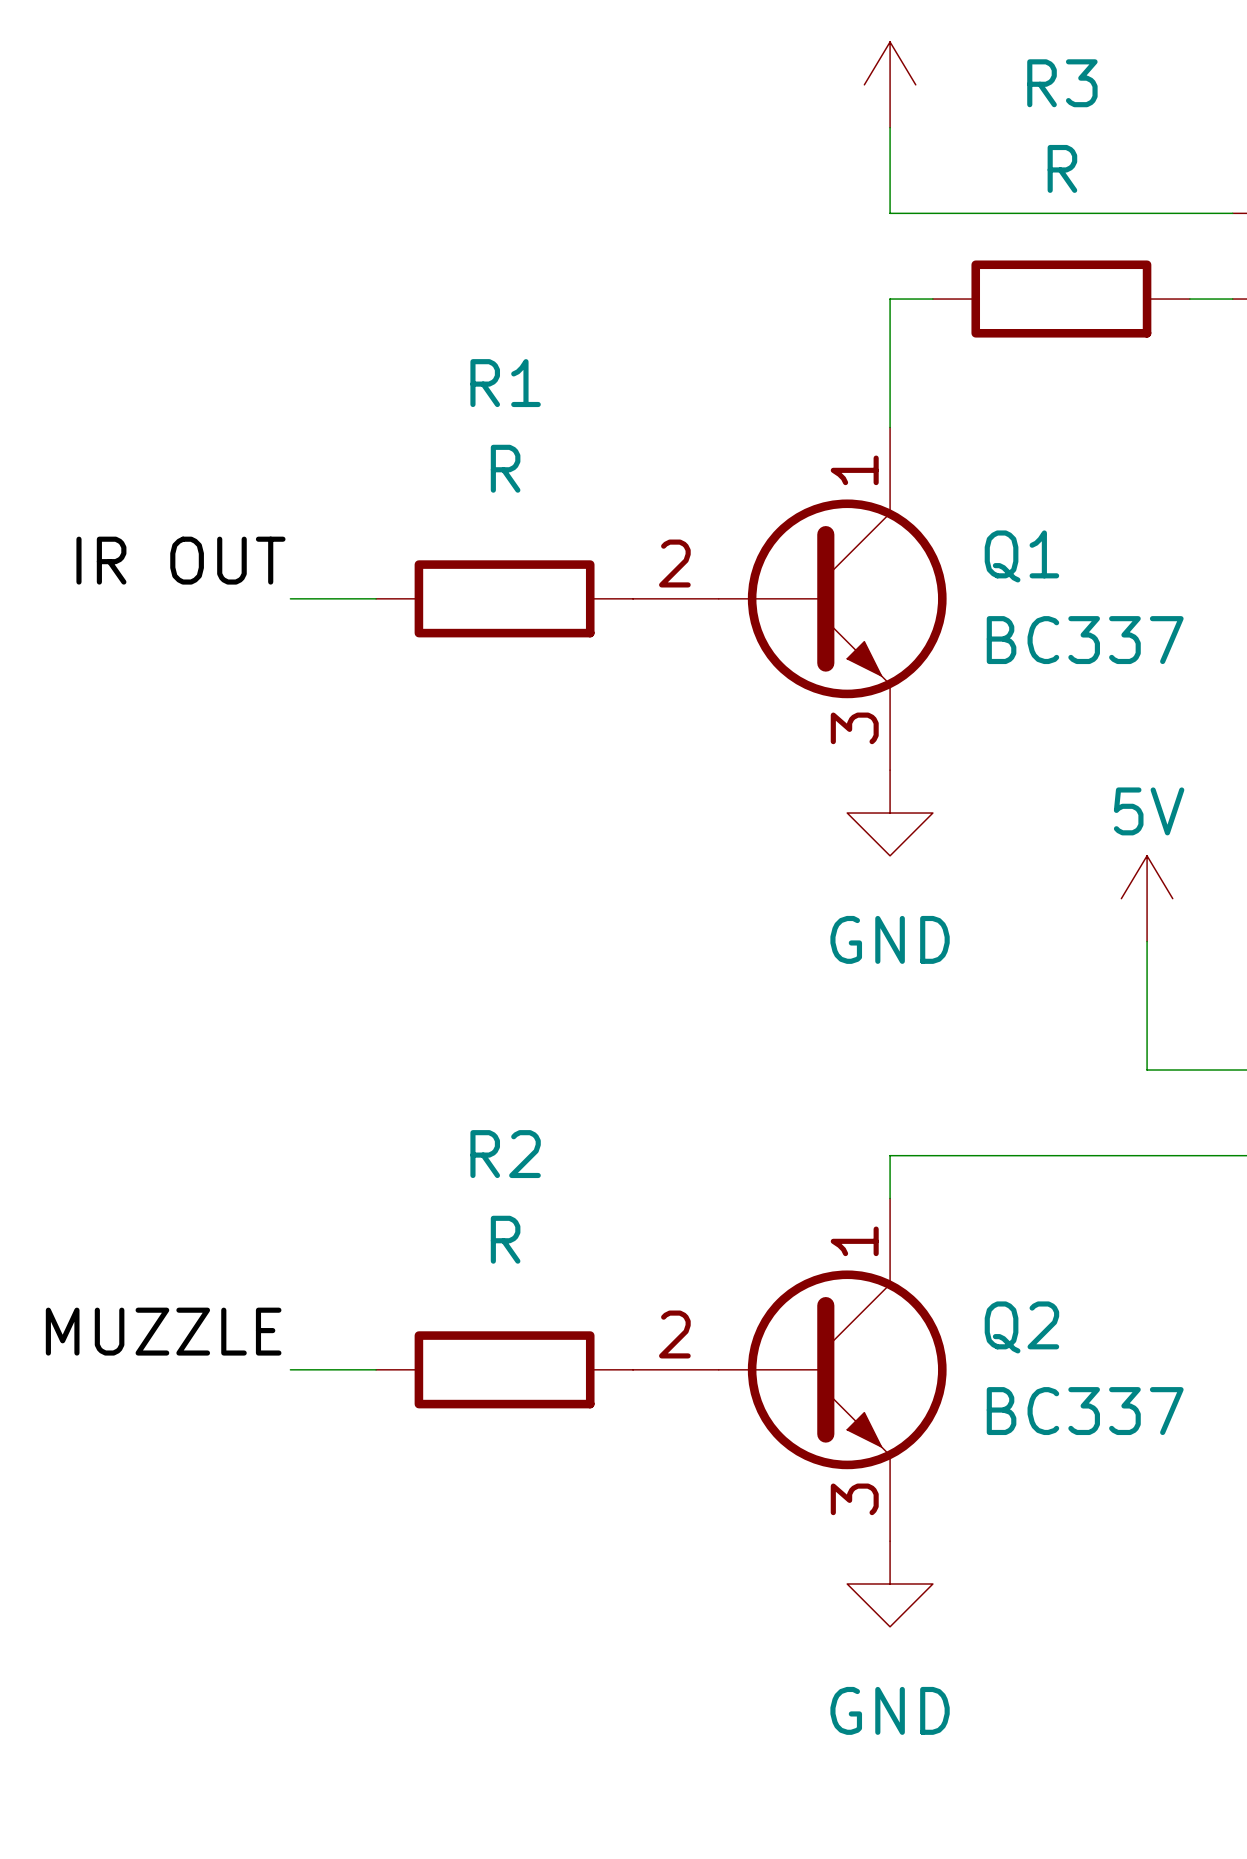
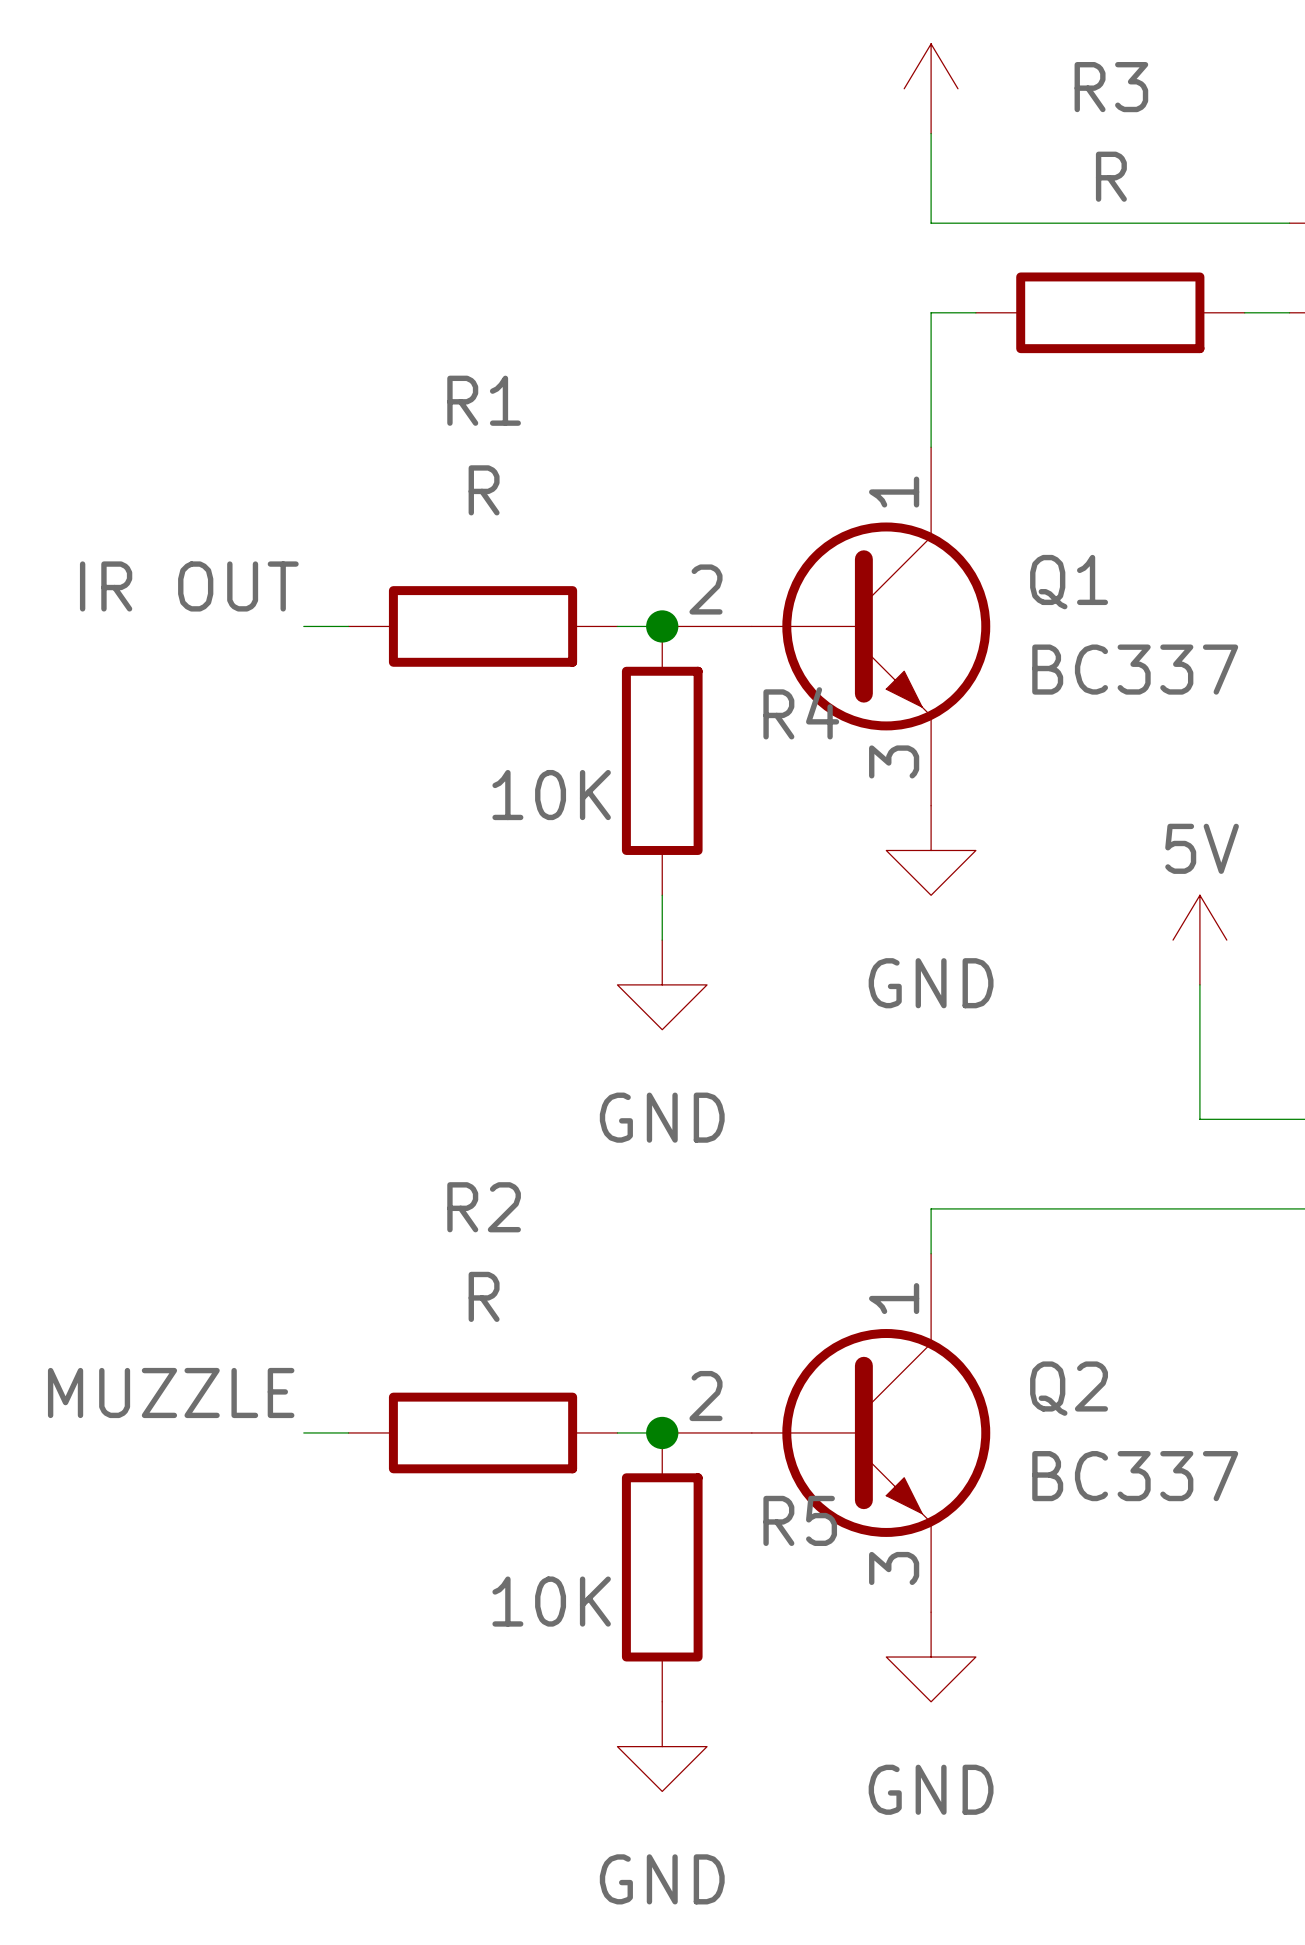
R1 position: (504, 598) -> (483, 626)
junction: none -> (662, 626)
R4: none -> 10K (662, 760)
wire: none -> (662, 895) (662, 940)
power symbol: none -> GND (662, 984)
R2 position: (504, 1369) -> (483, 1432)
junction: none -> (662, 1432)
R5: none -> 10K (662, 1567)
power symbol: none -> GND (662, 1746)

